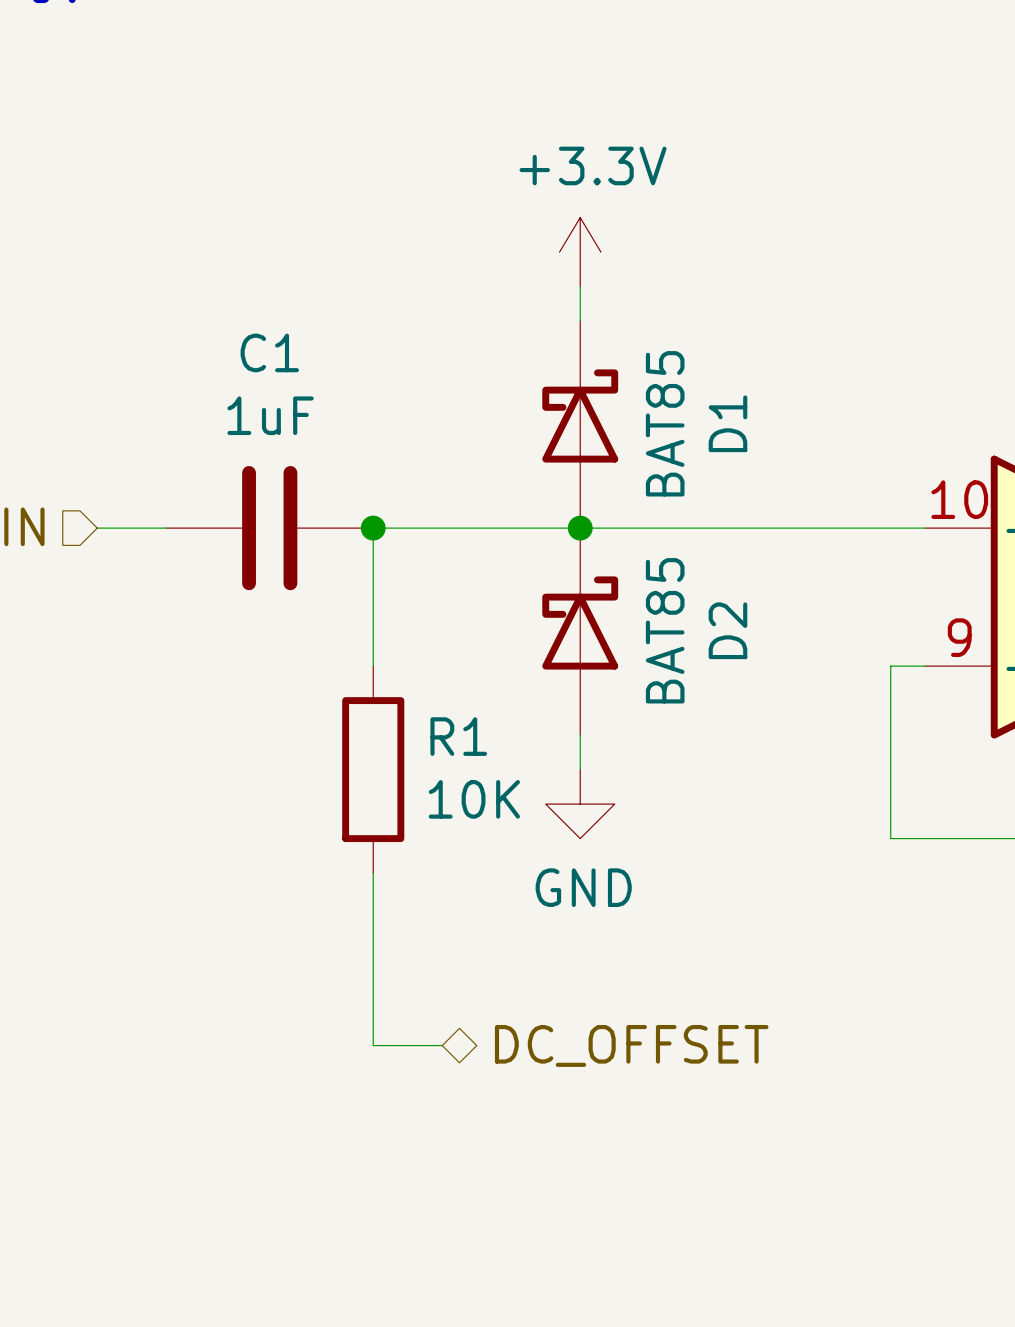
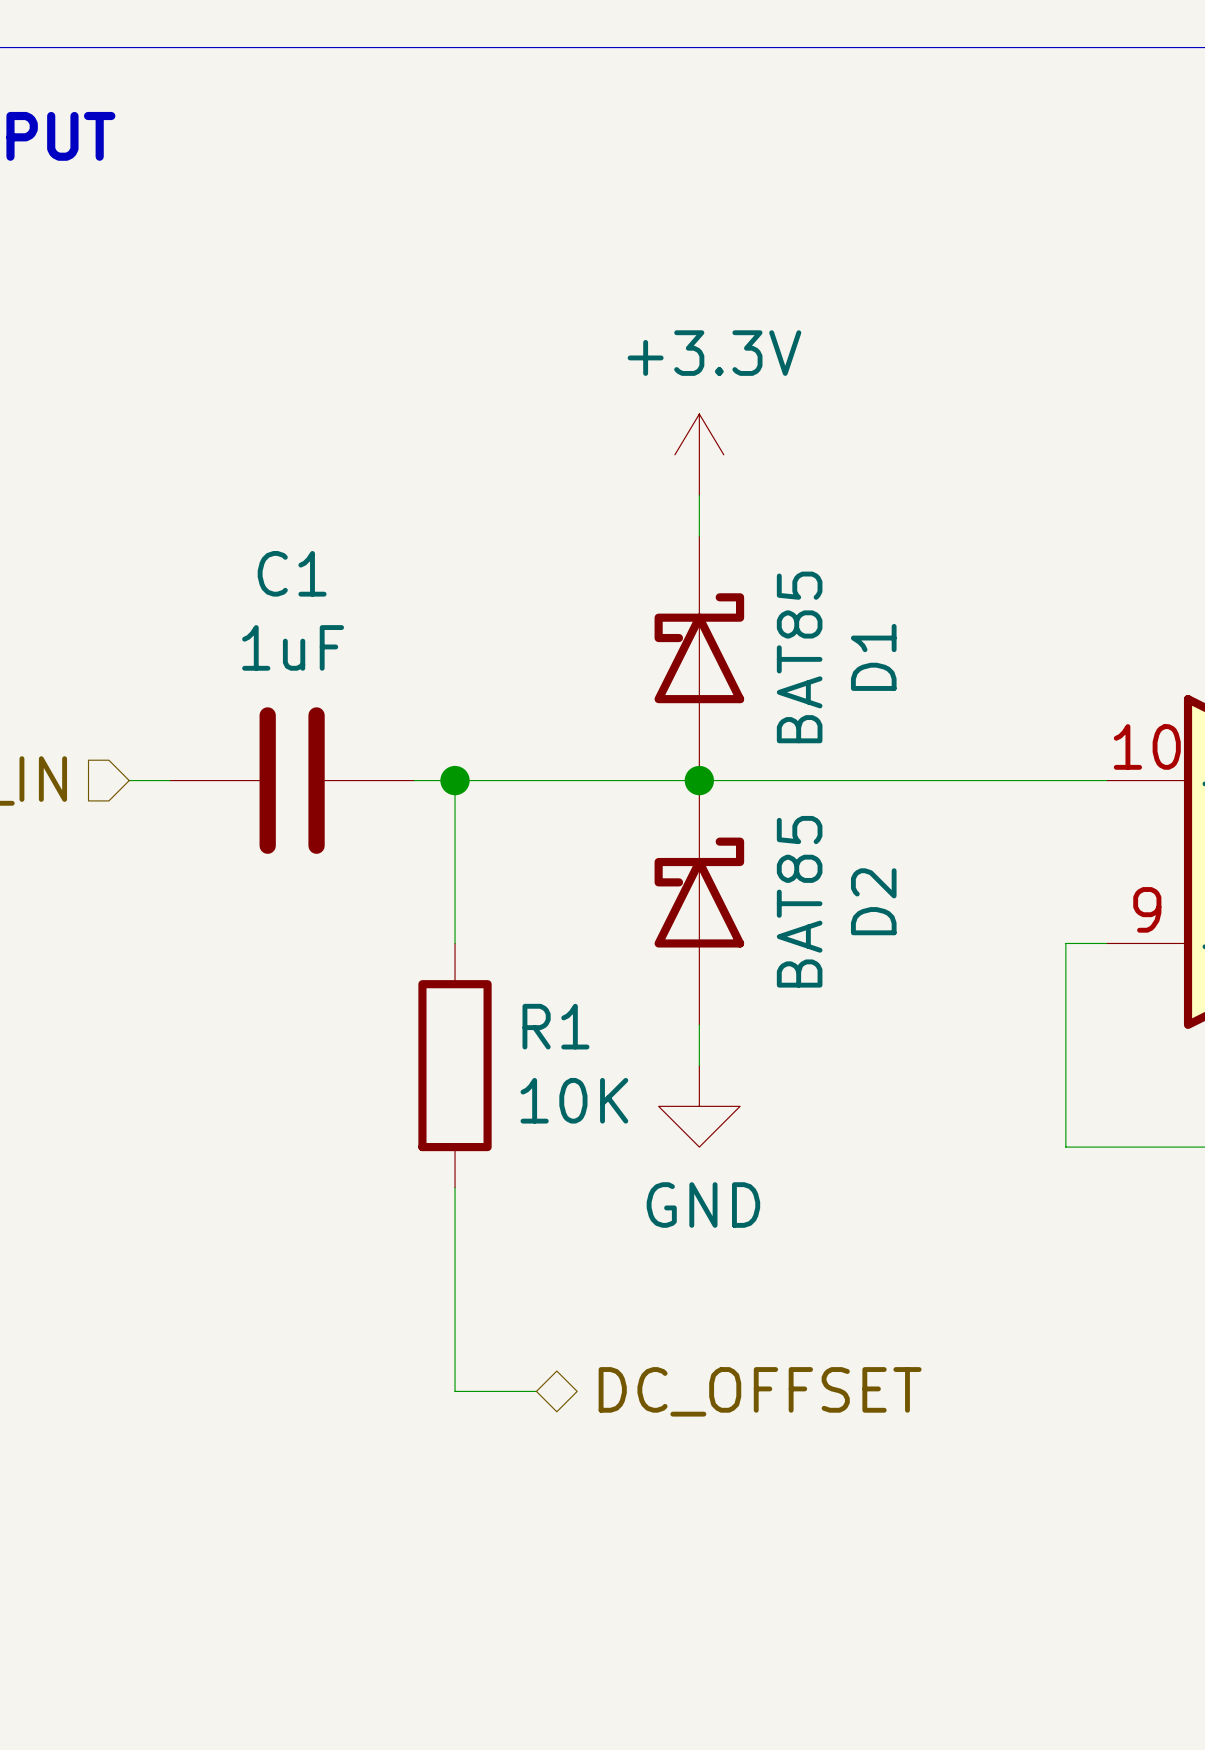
C1 position: (269, 528) -> (292, 780)

